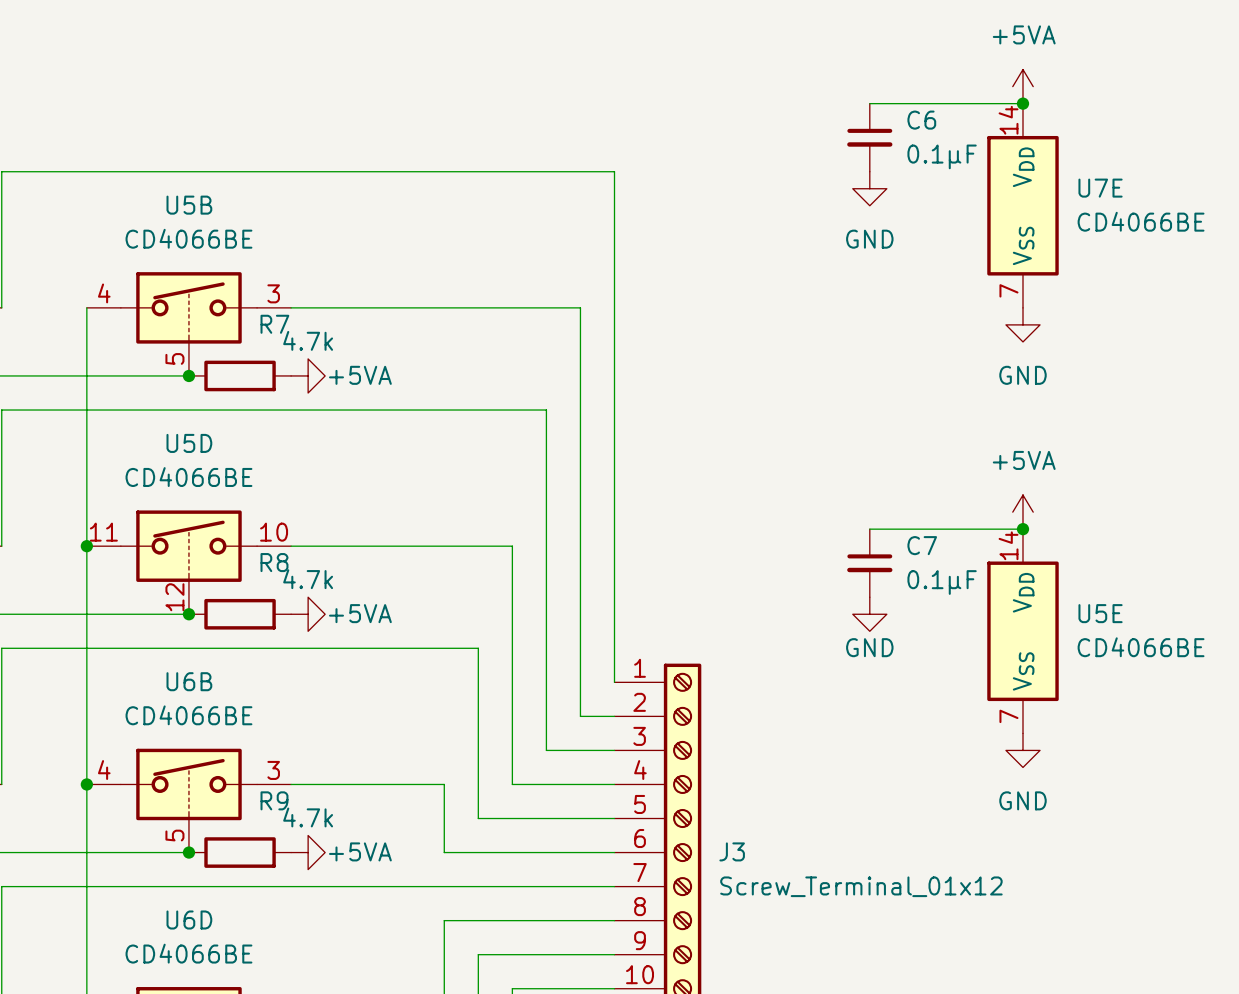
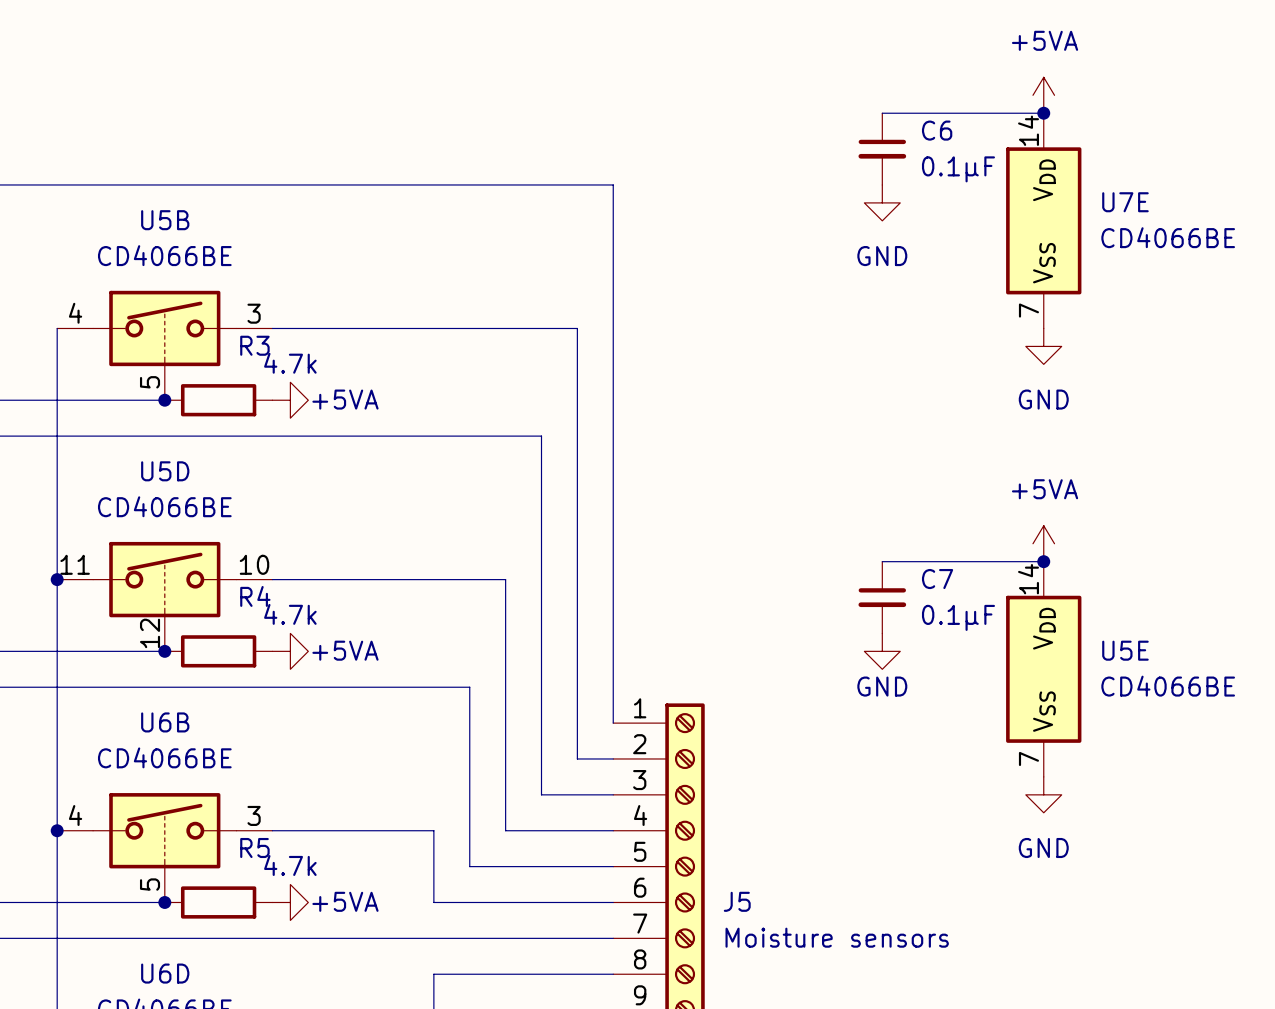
R7 name: R7 (274, 324) -> R3 (254, 345)
R8 name: R8 (274, 562) -> R4 (255, 596)
R9 name: R9 (274, 800) -> R5 (254, 848)
J3 name: J3 (732, 851) -> J5 (737, 901)
J3 value: Screw_Terminal_01x12 (861, 886) -> Moisture sensors (837, 937)

